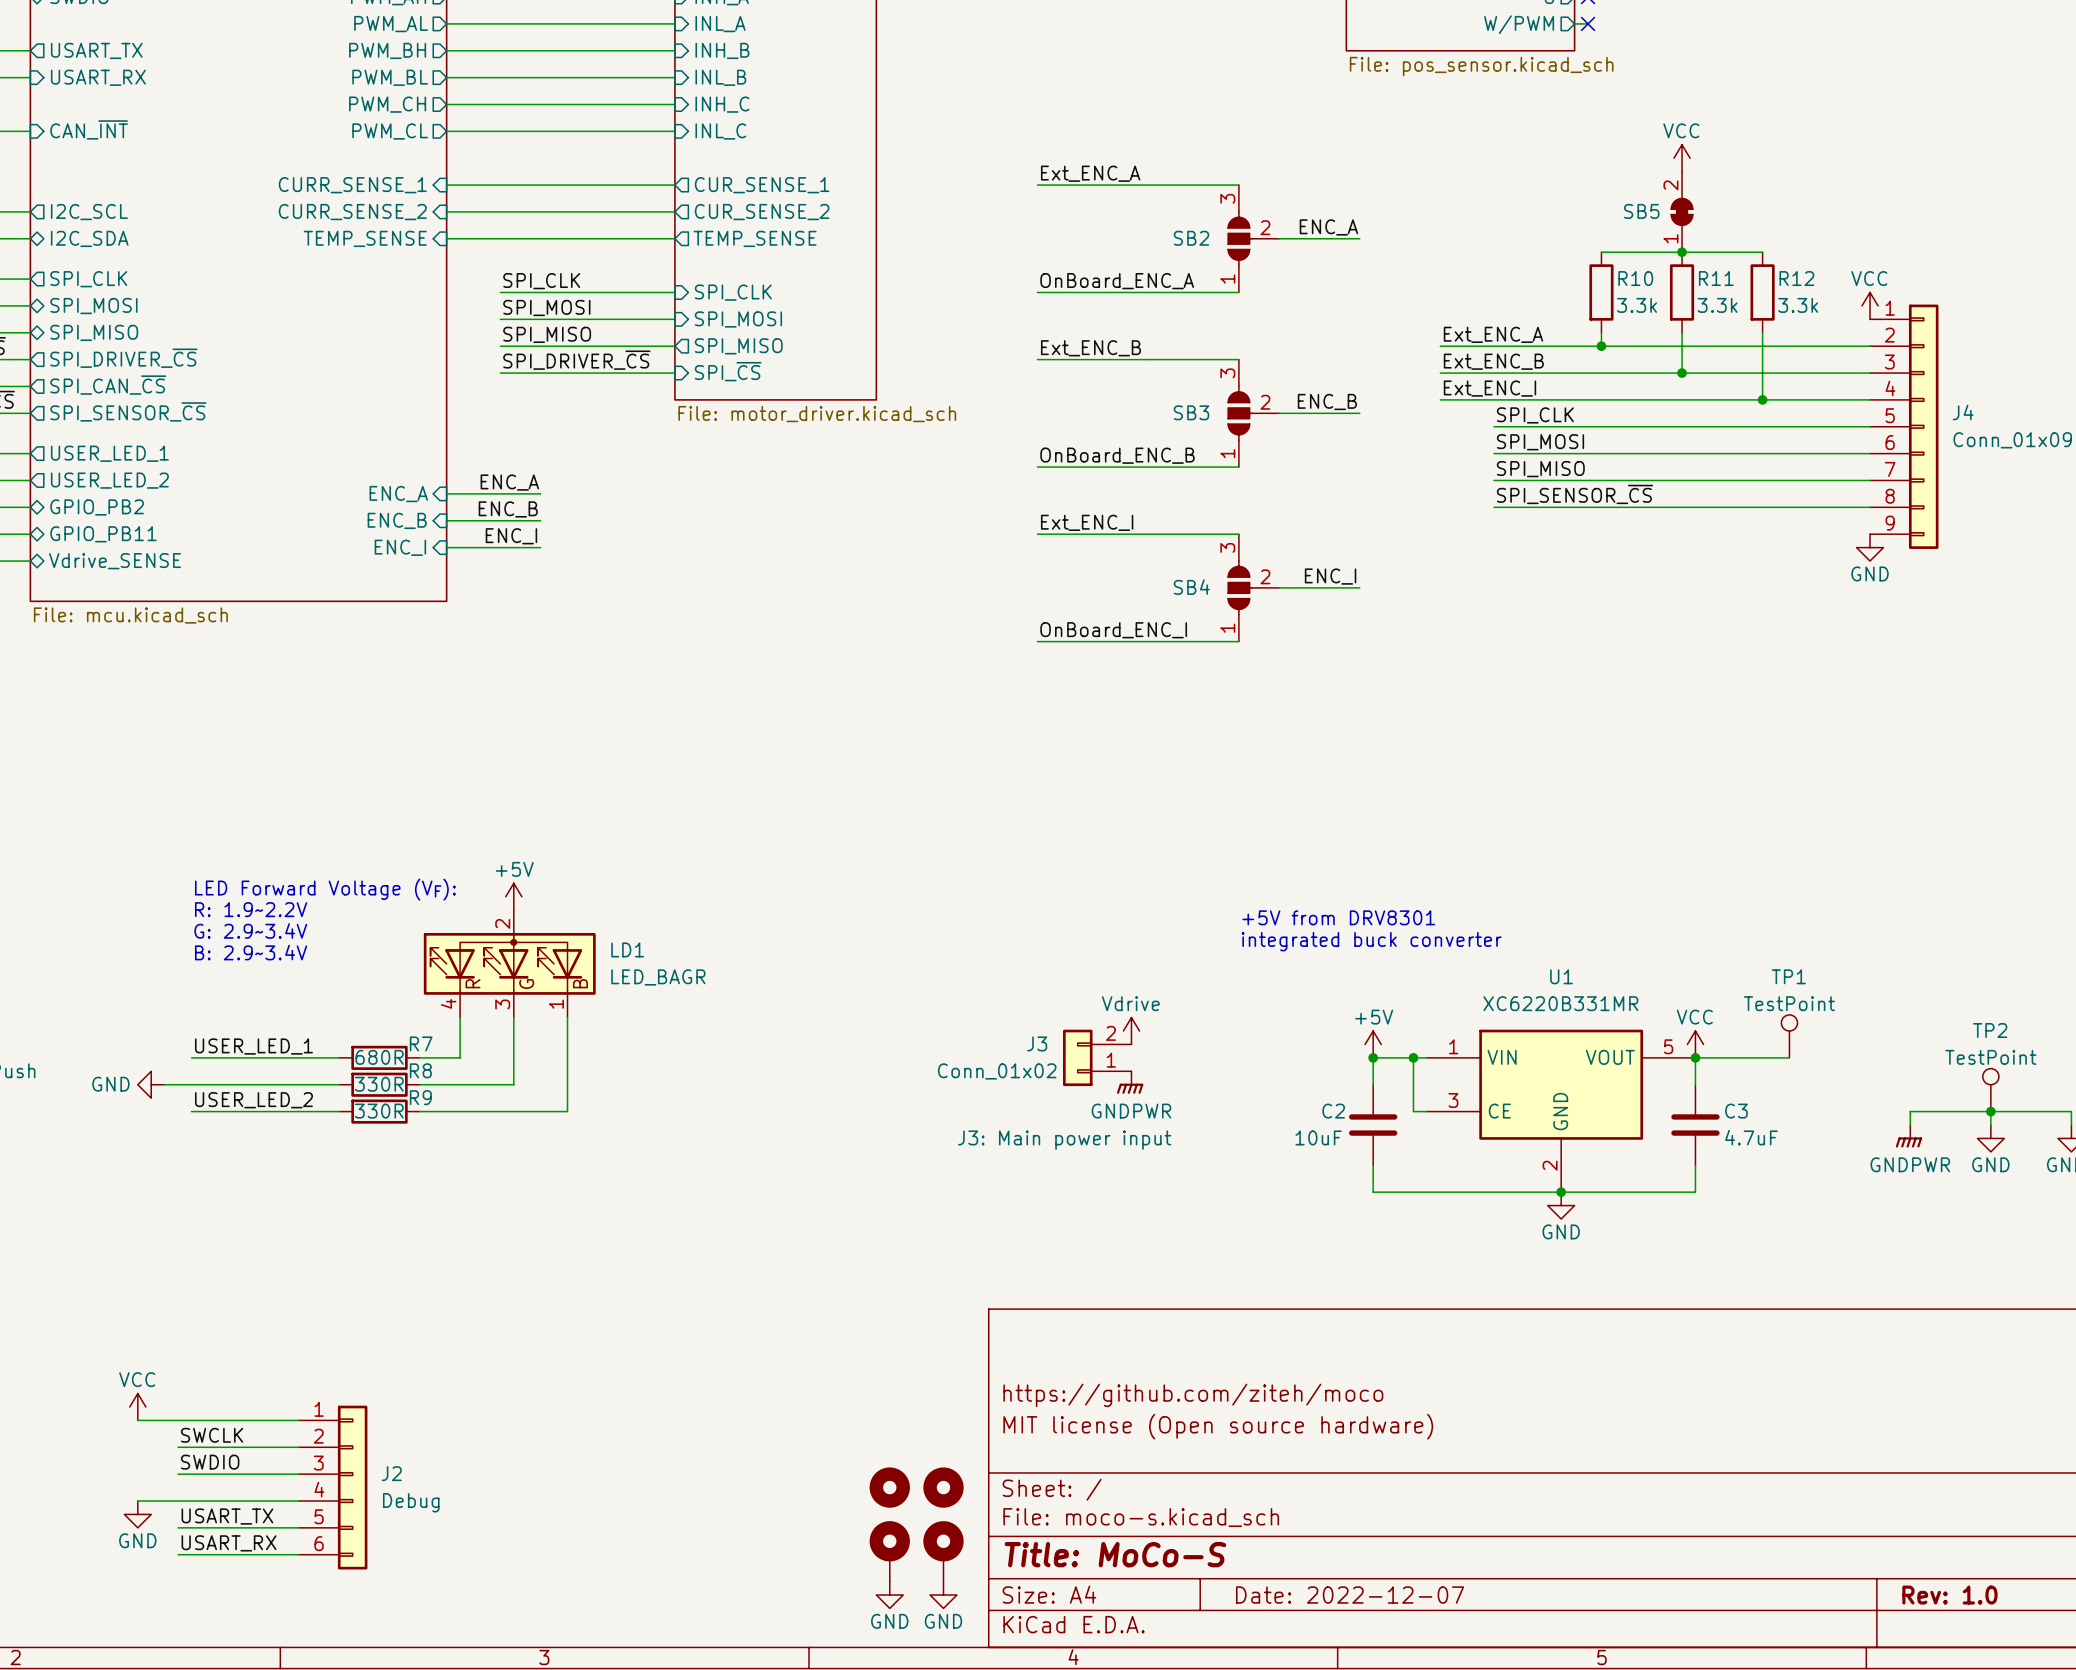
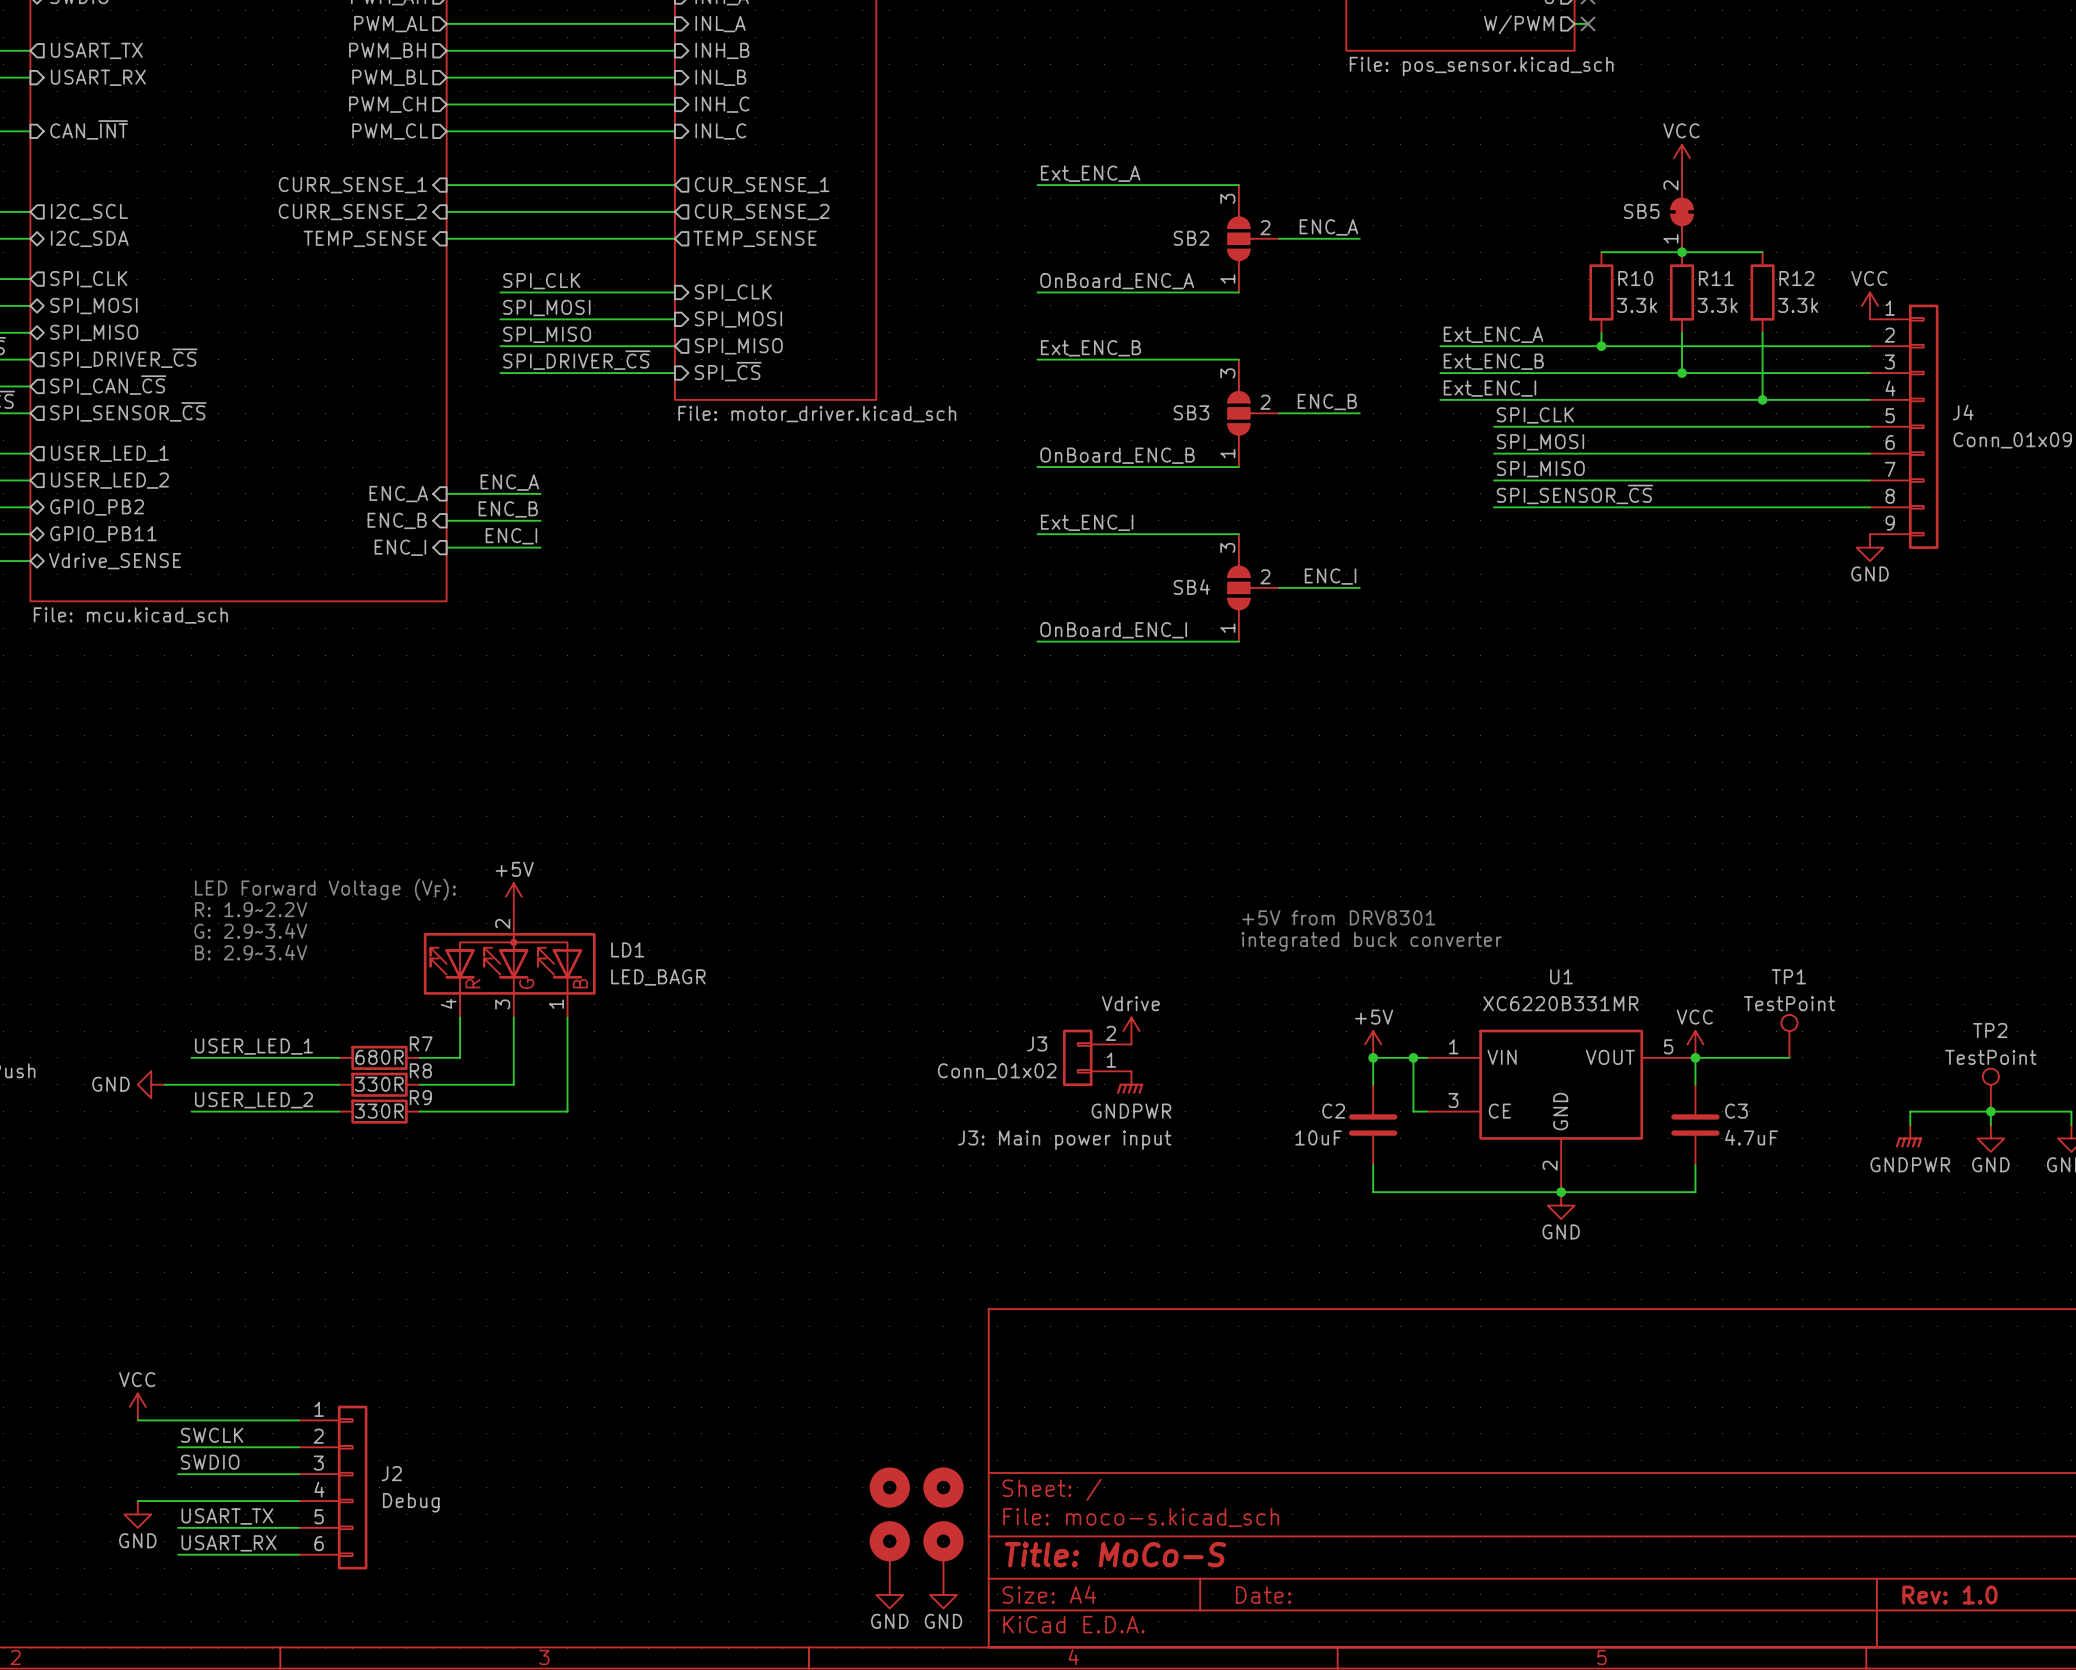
title block: https://github.com/ziteh/moco (1193, 1395) -> none
title block: MIT license (Open source hardware) (1218, 1426) -> none
title block: Date: 2022-12-07 (1350, 1595) -> Date: (1263, 1595)

